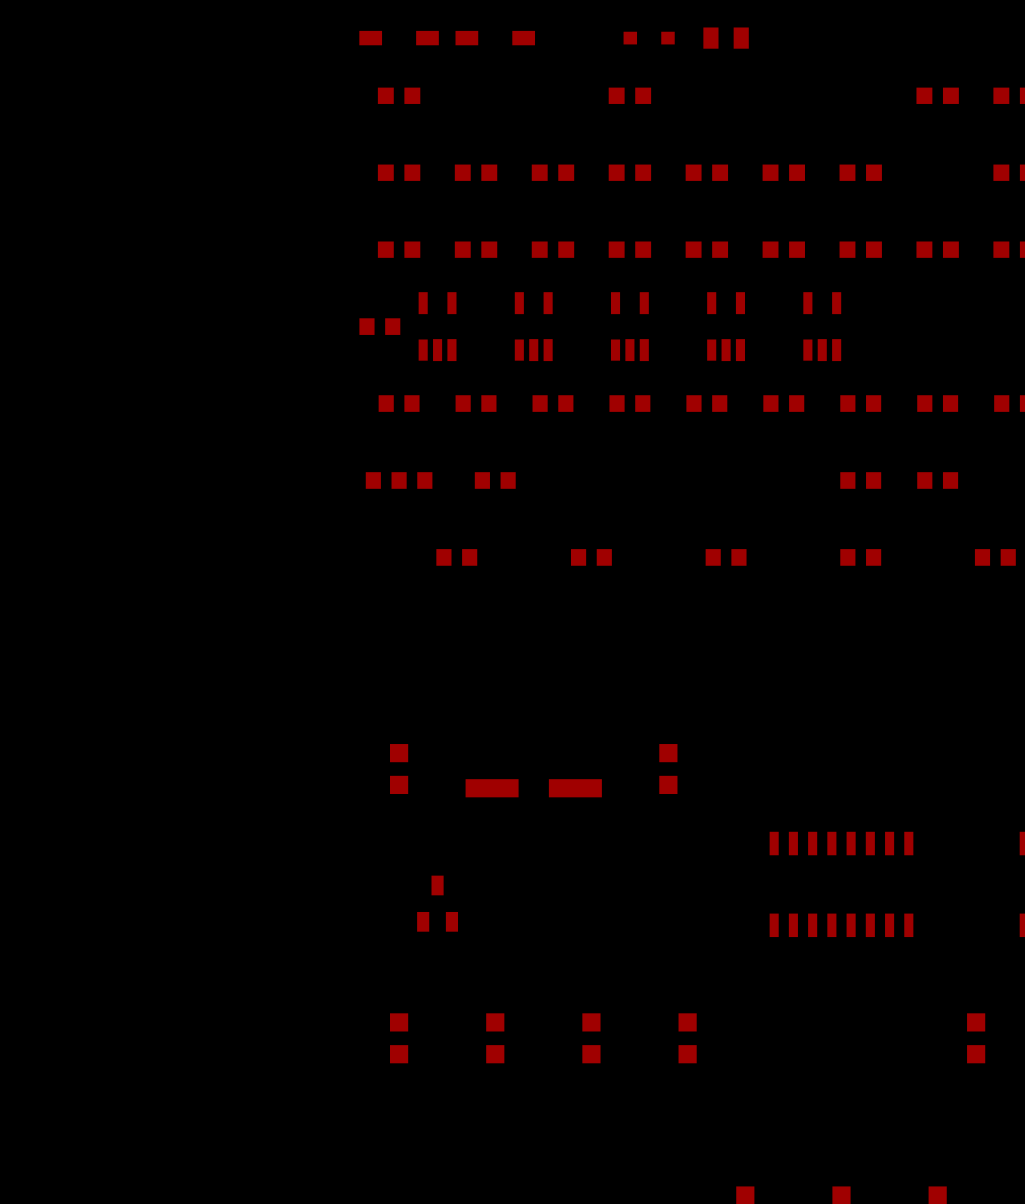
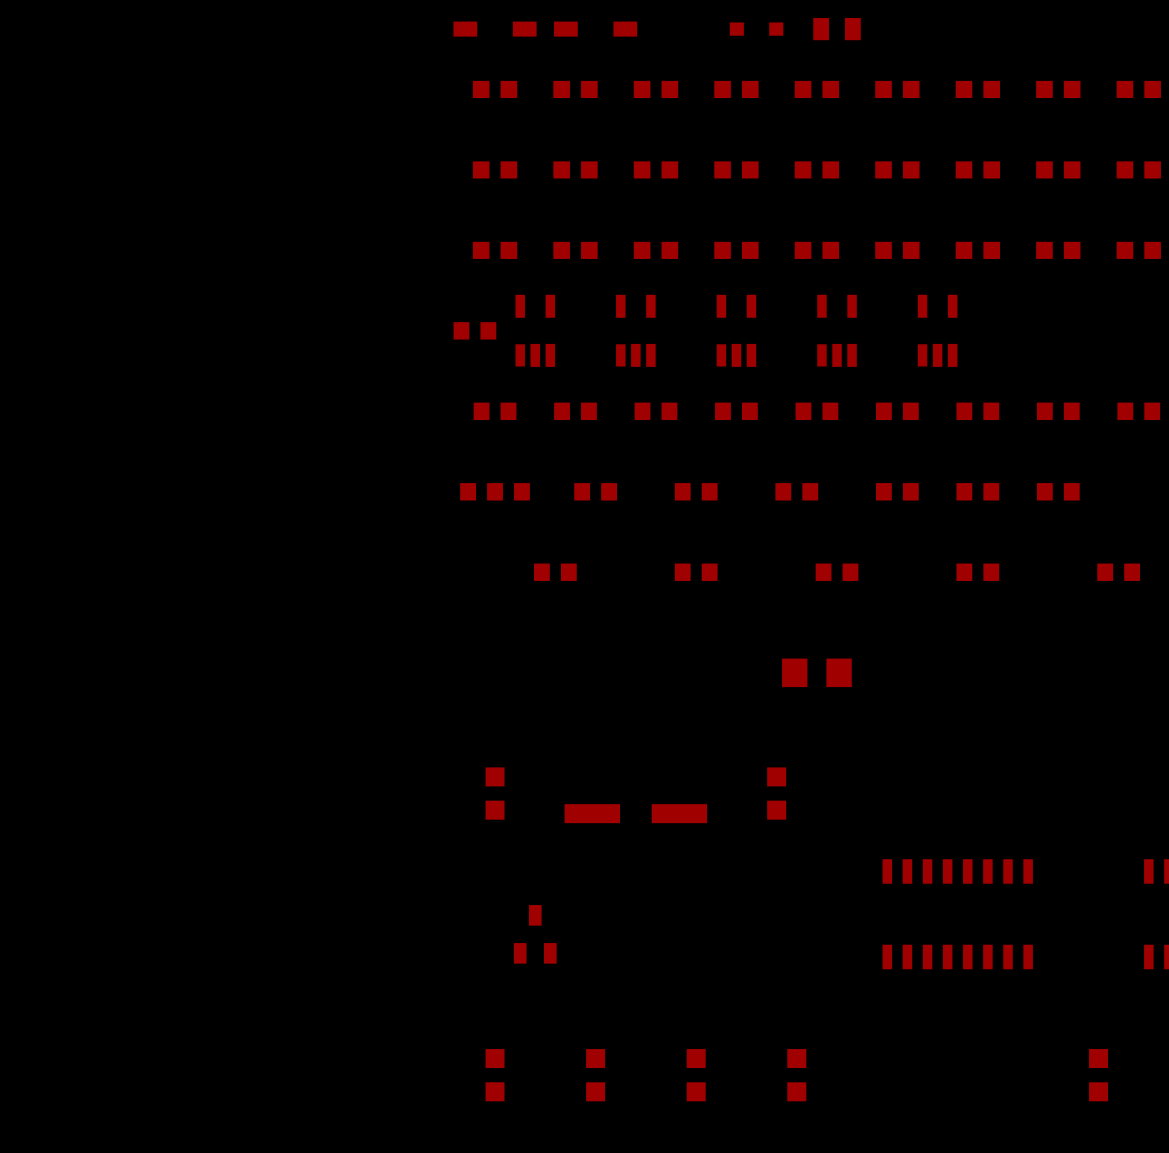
part: none -> (575, 89)
part: none -> (655, 89)
part: none -> (816, 89)
part: none -> (897, 89)
part: none -> (977, 89)
part: none -> (1058, 169)
part: none -> (696, 491)
part: none -> (796, 491)
part: none -> (897, 491)
part: none -> (816, 672)

